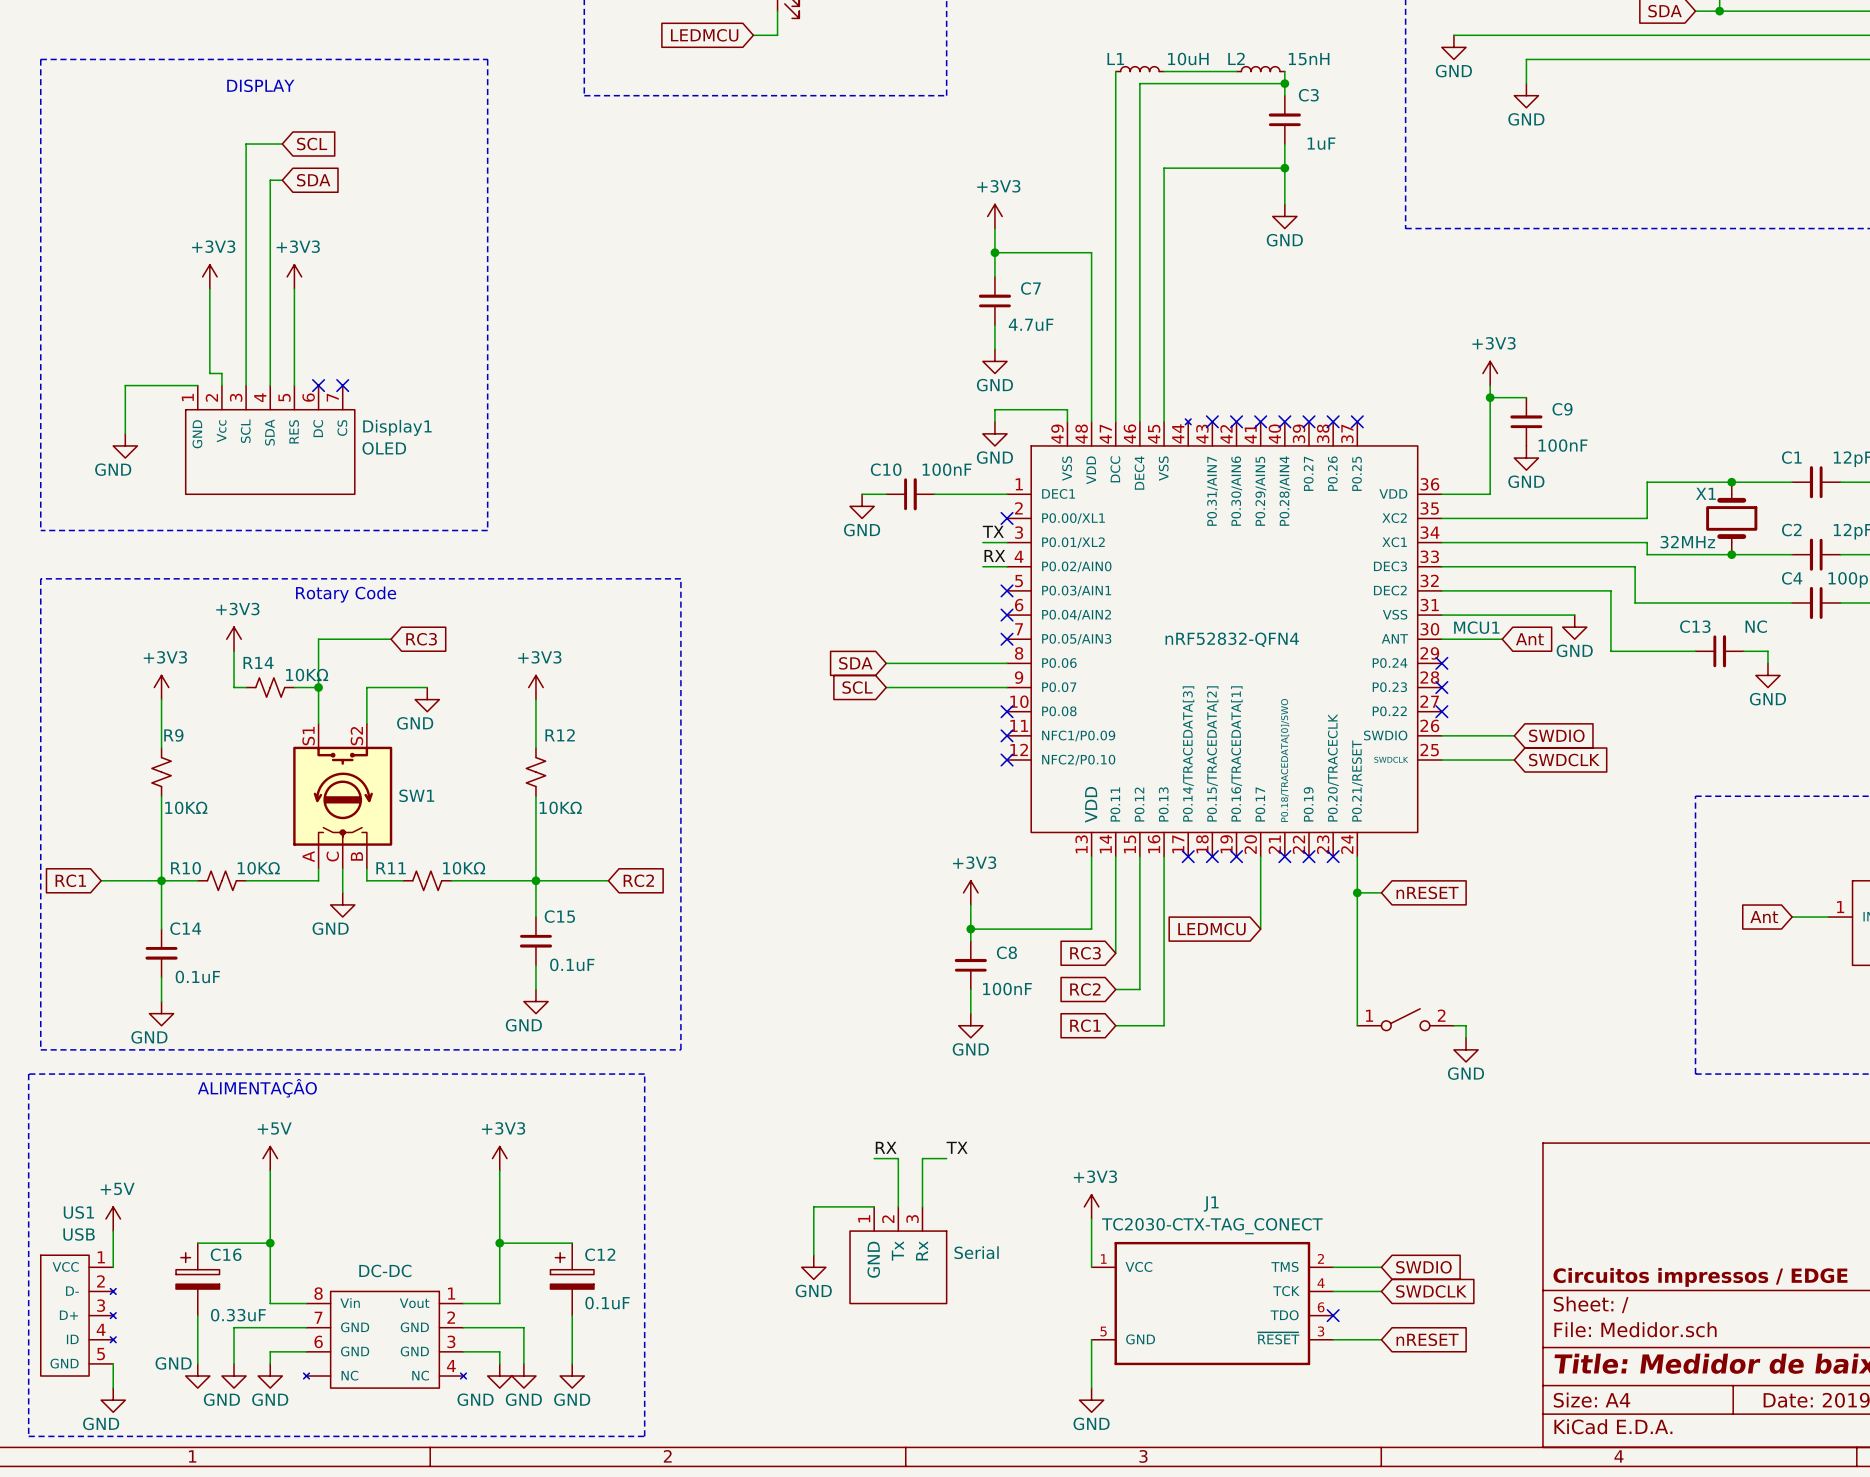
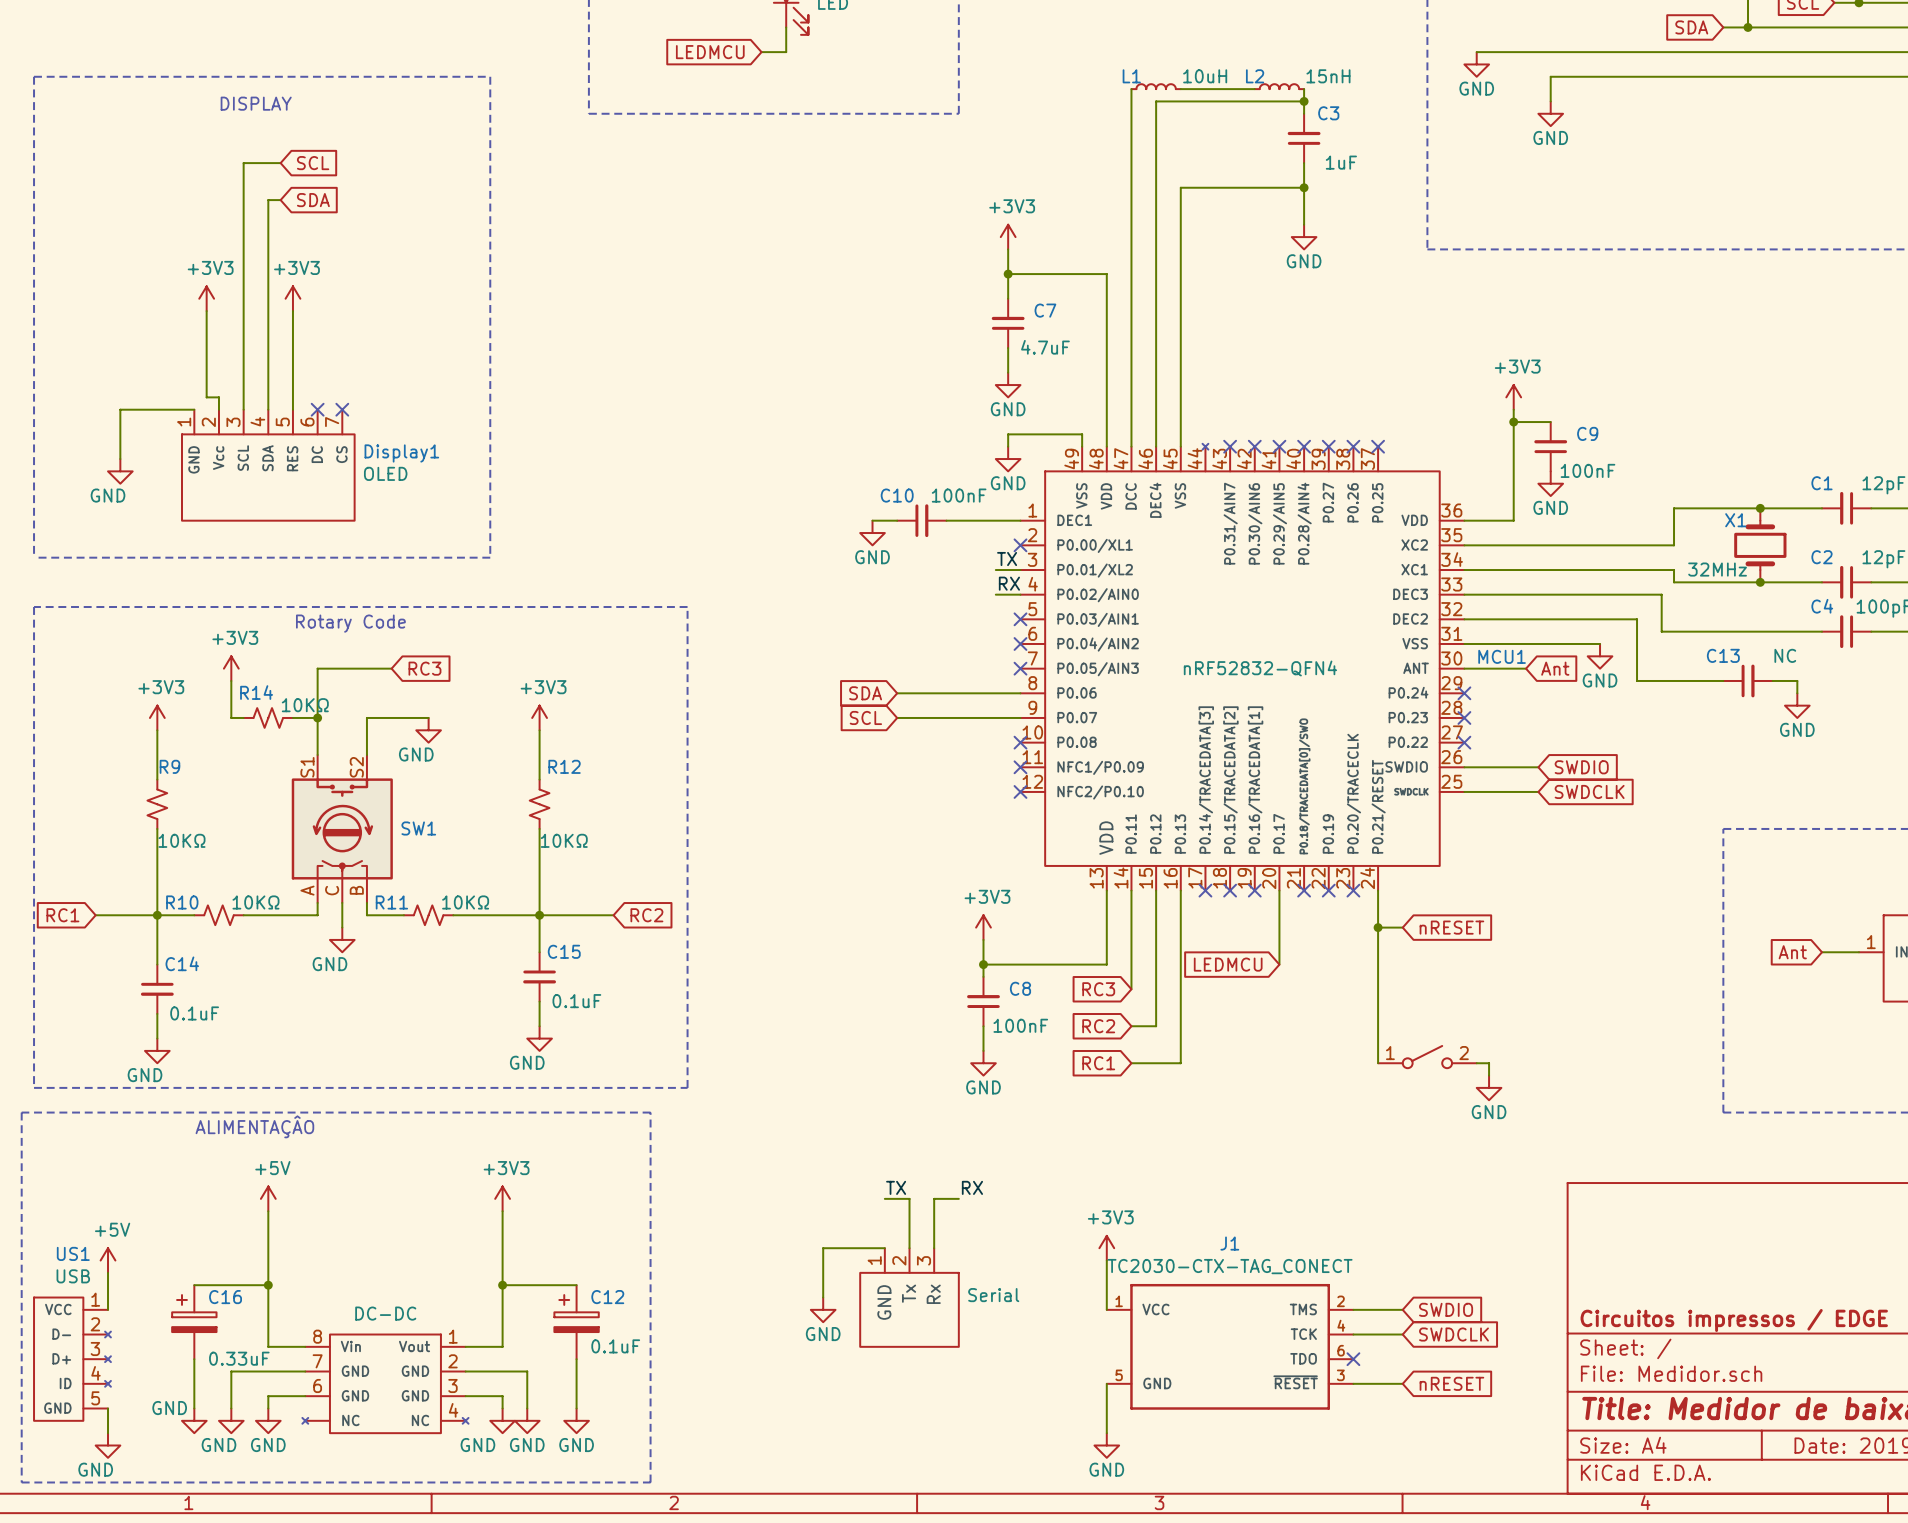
label: RX (886, 1147) -> TX (896, 1187)
label: TX (957, 1147) -> RX (972, 1187)

